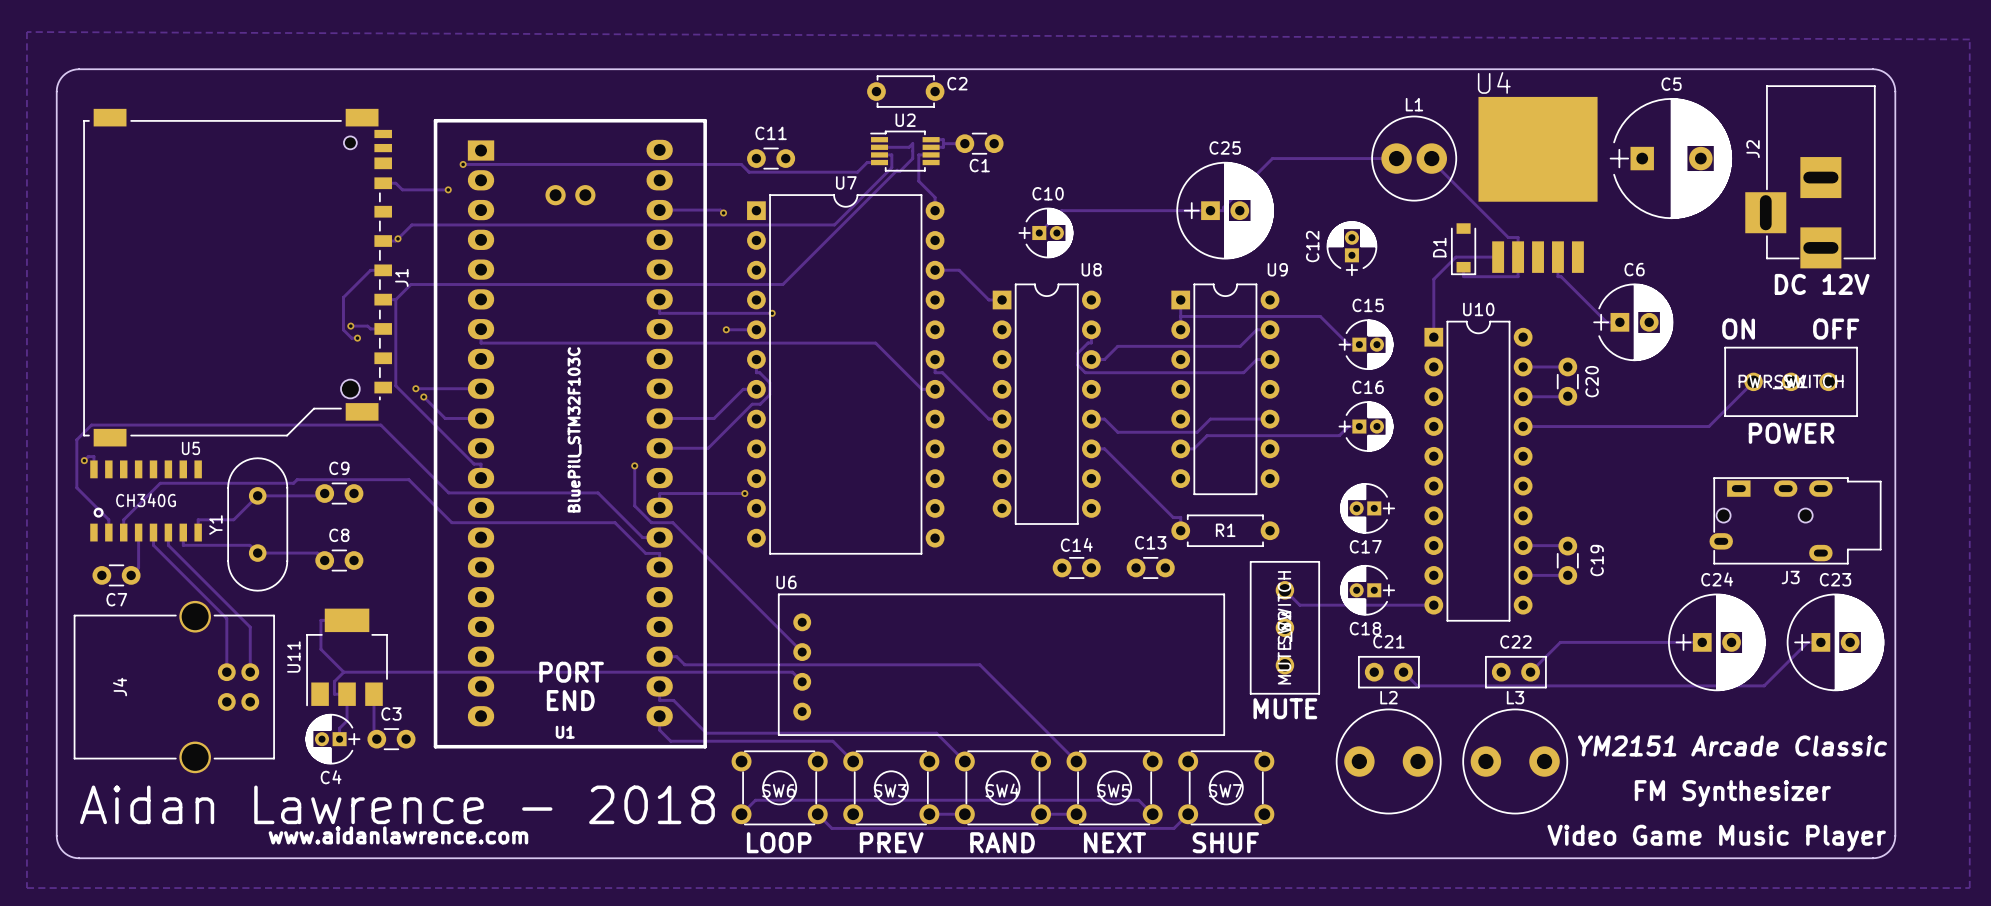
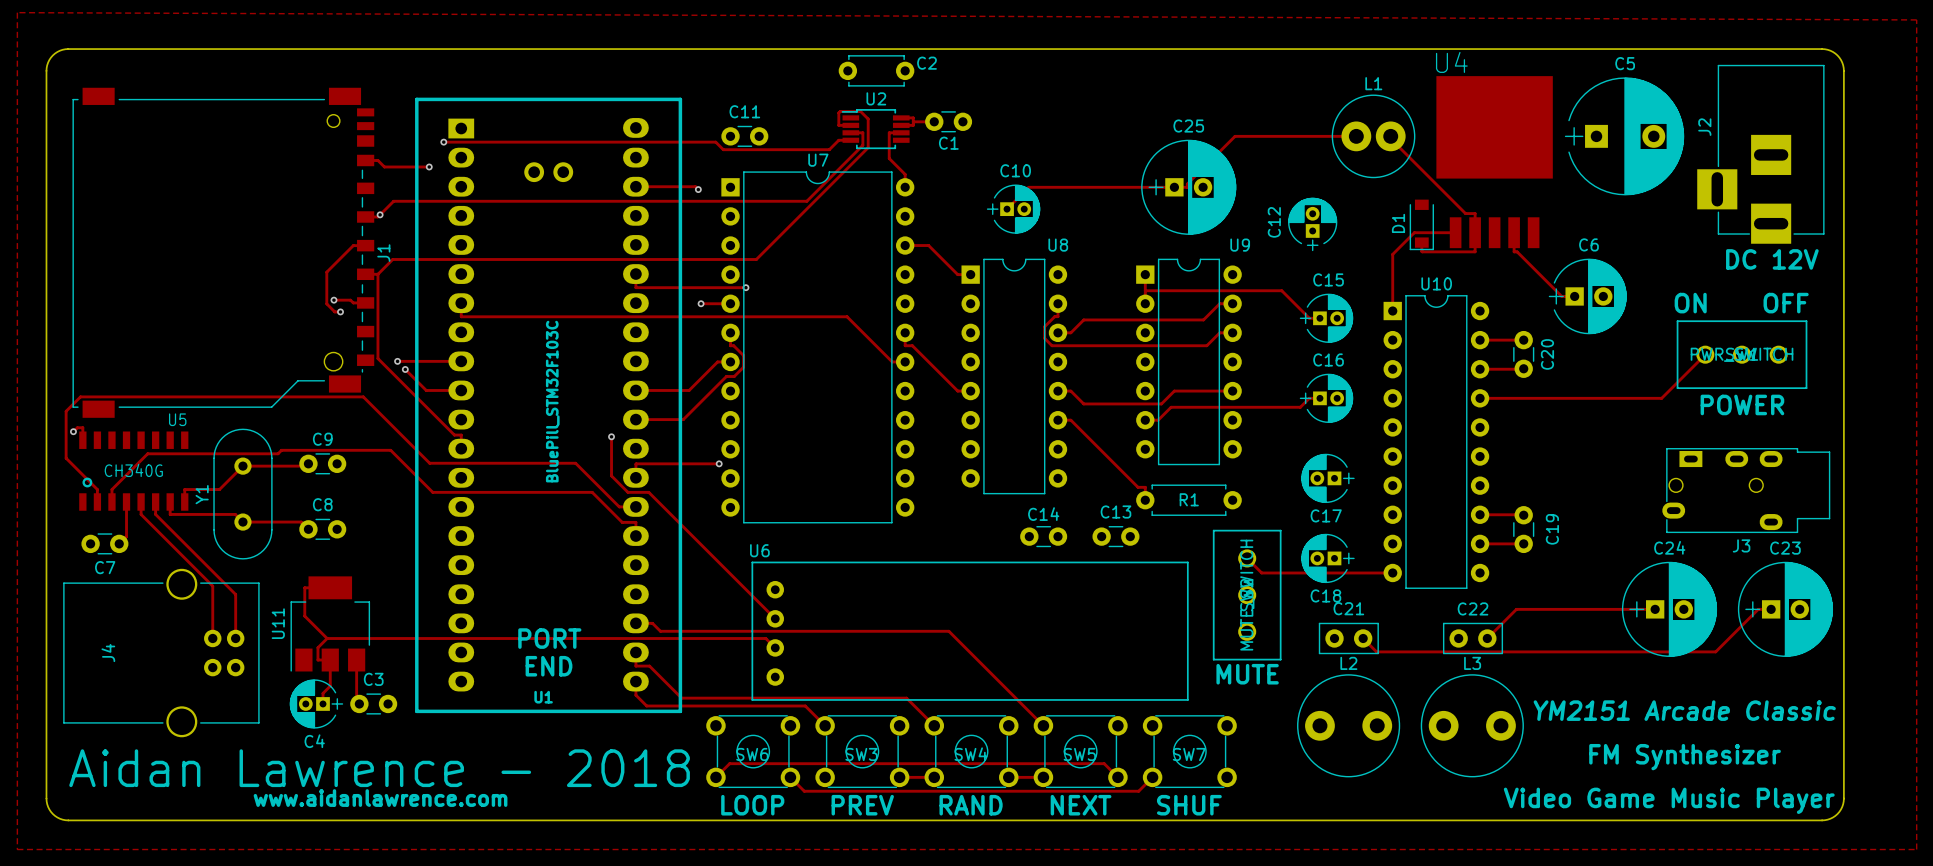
track: (879, 147) (909, 147) (912, 143) (912, 158) (899, 171) (895, 171) -> (850, 125) (838, 125) (840, 111) (860, 111) (868, 119) (868, 147)

